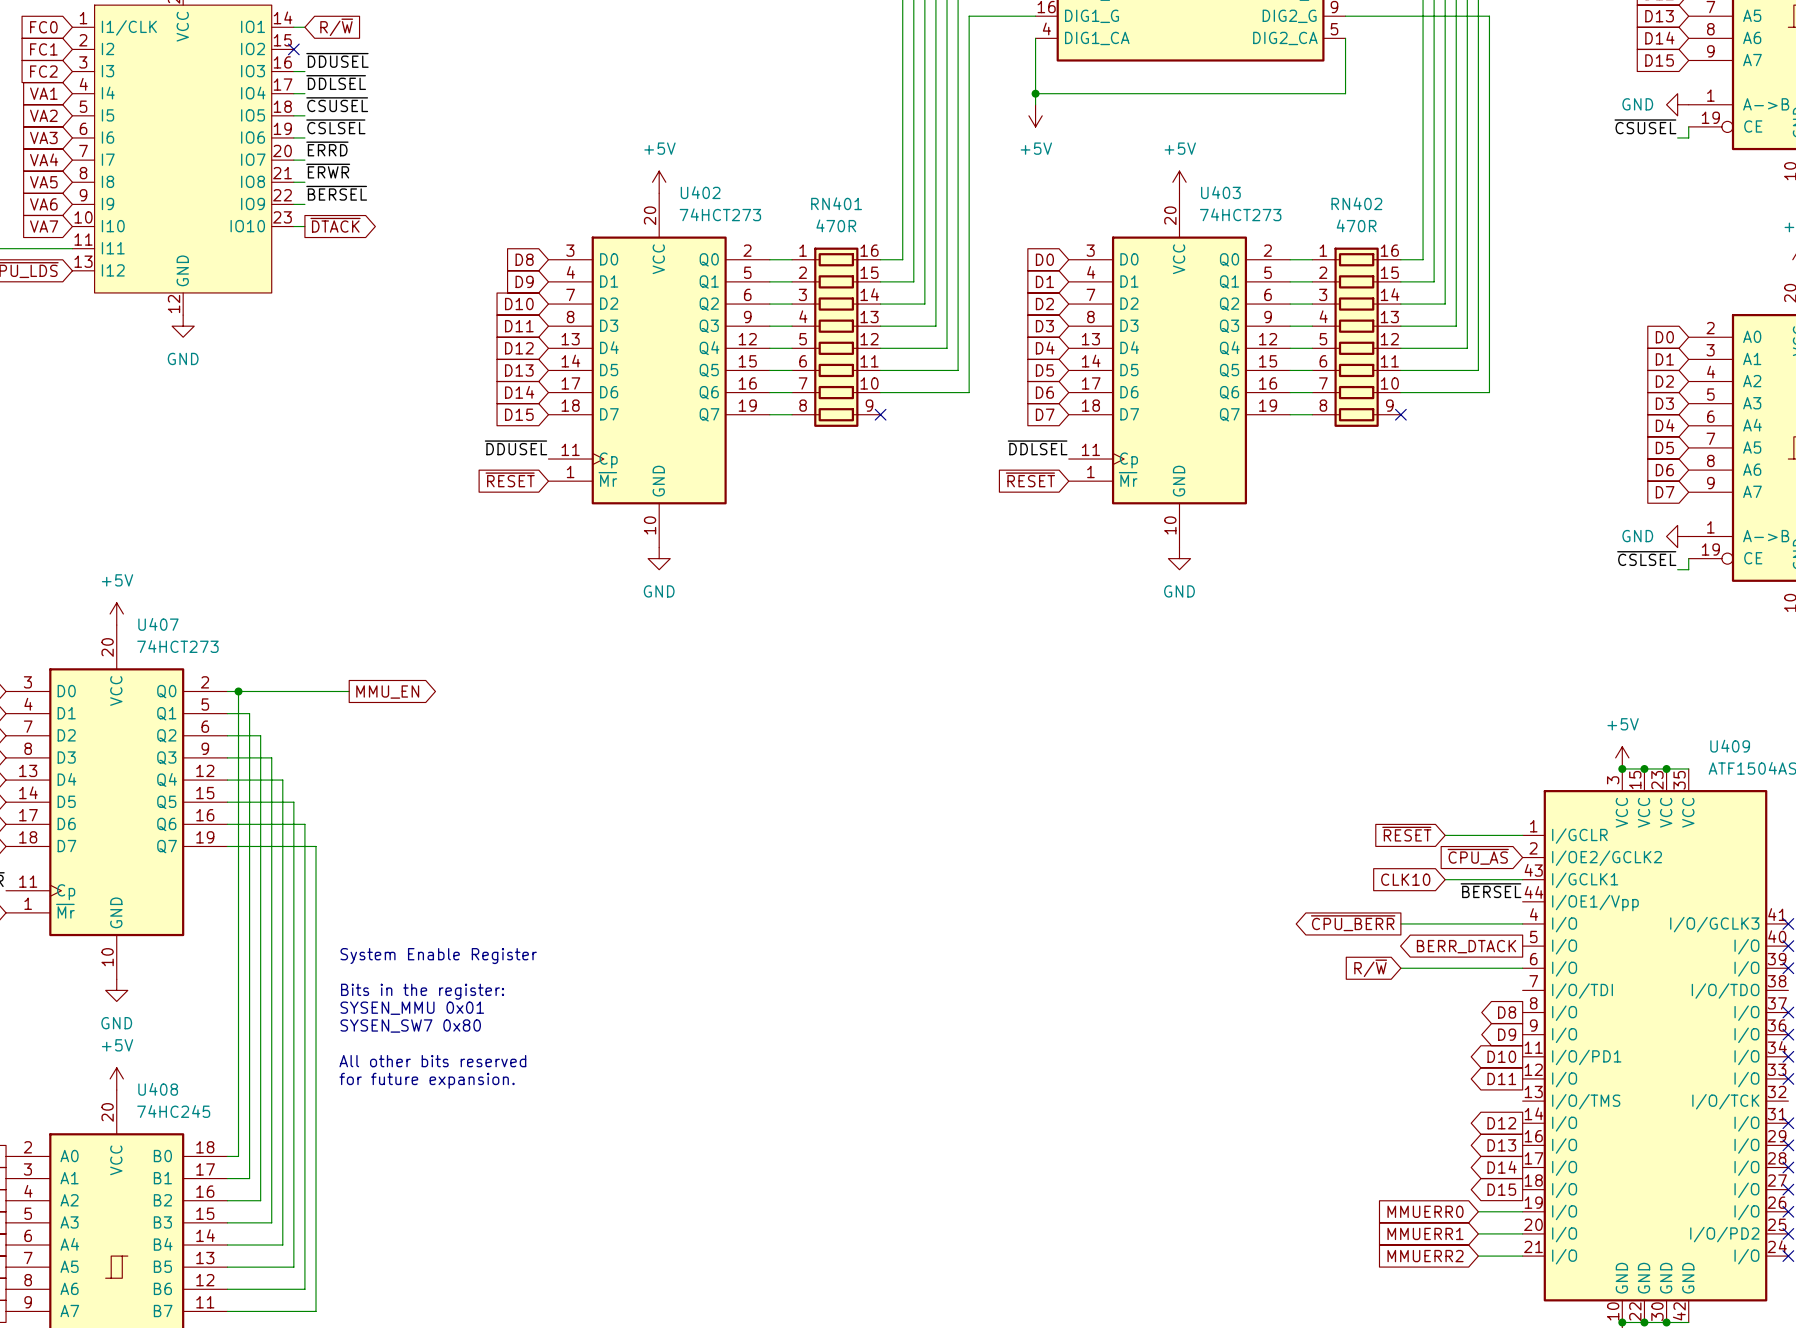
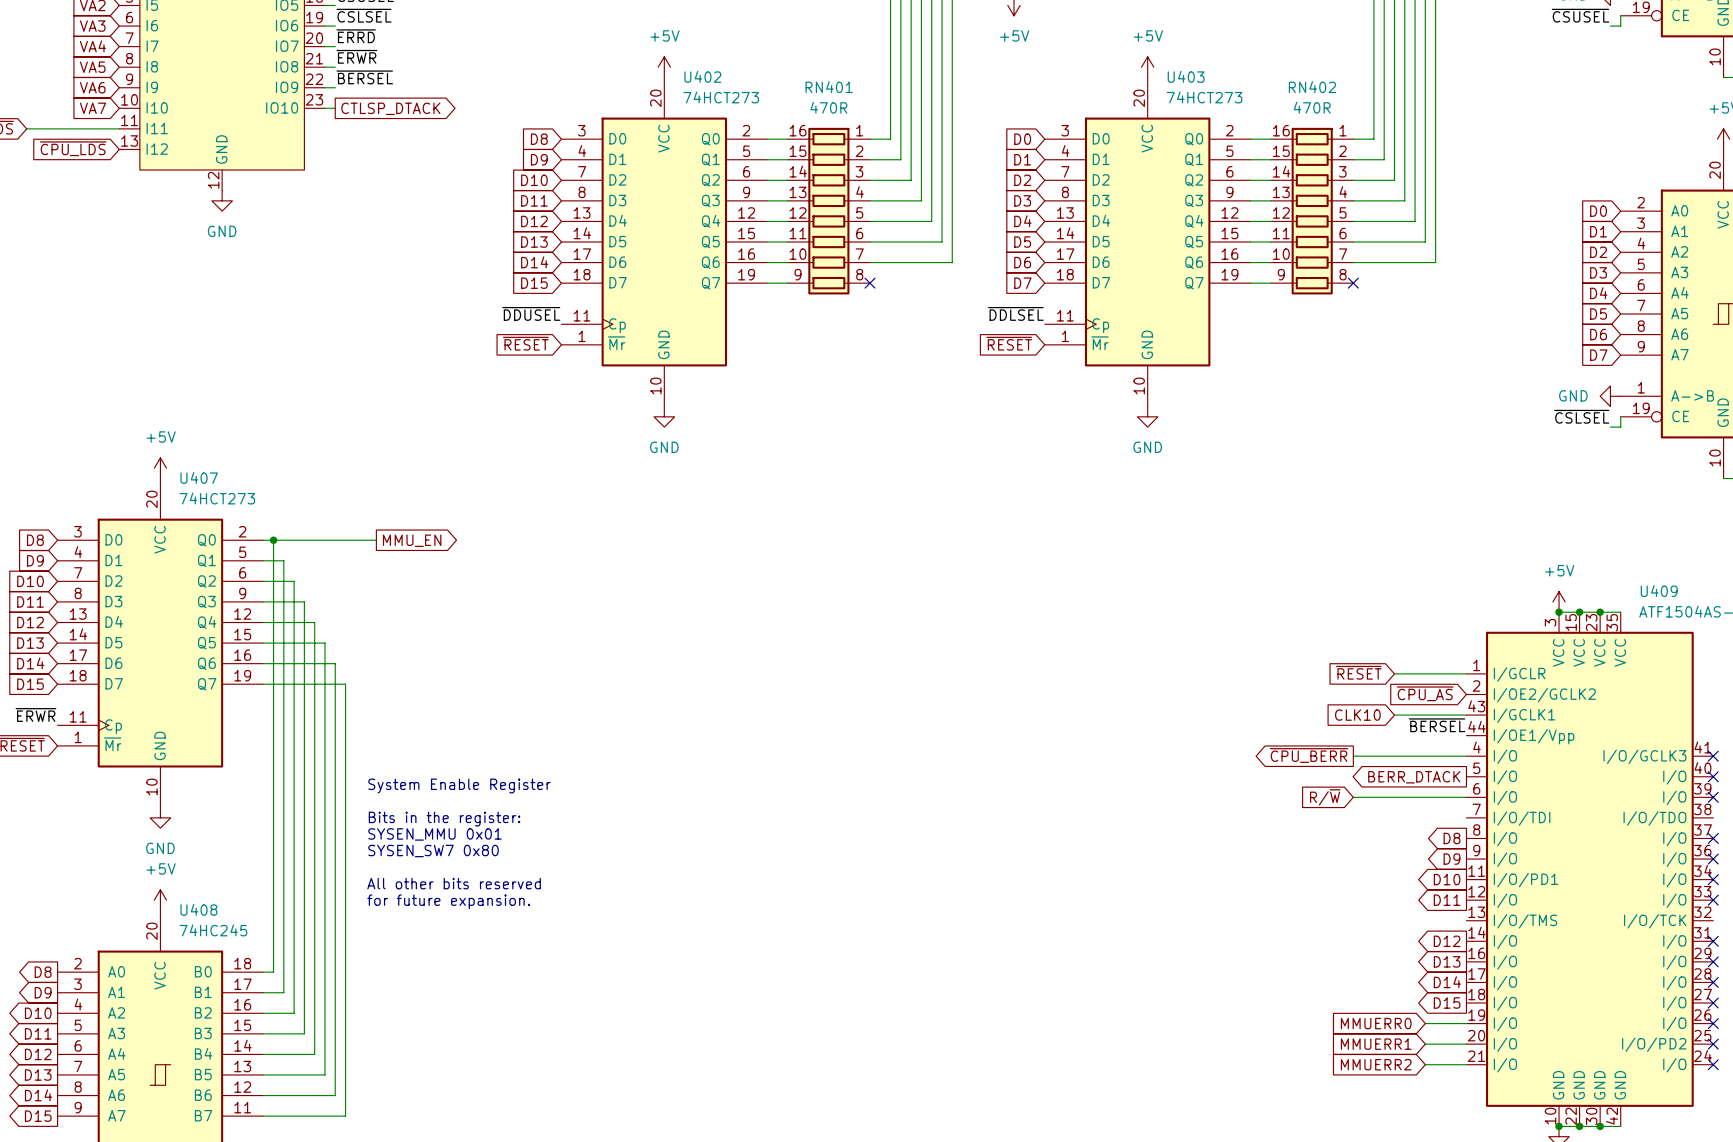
global label: ~{DTACK} (335, 225) -> CTLSP_DTACK (390, 108)
RN401 flip: as is (836, 337) -> left-right (828, 211)
RN402 flip: as is (1356, 337) -> left-right (1312, 211)

